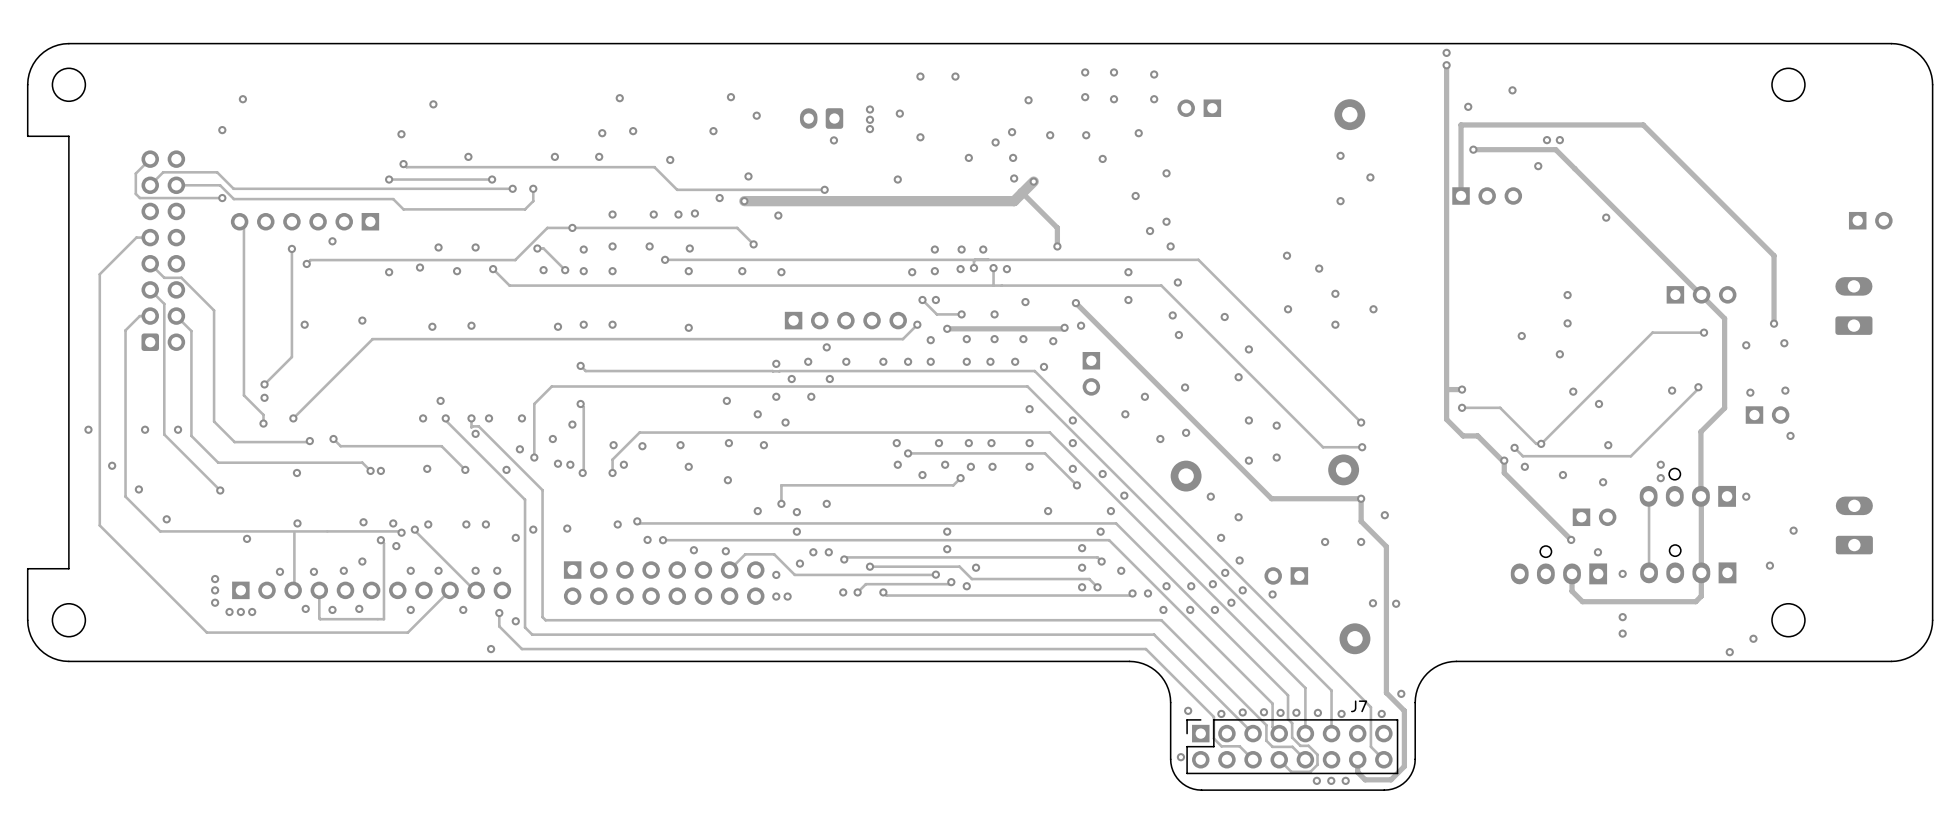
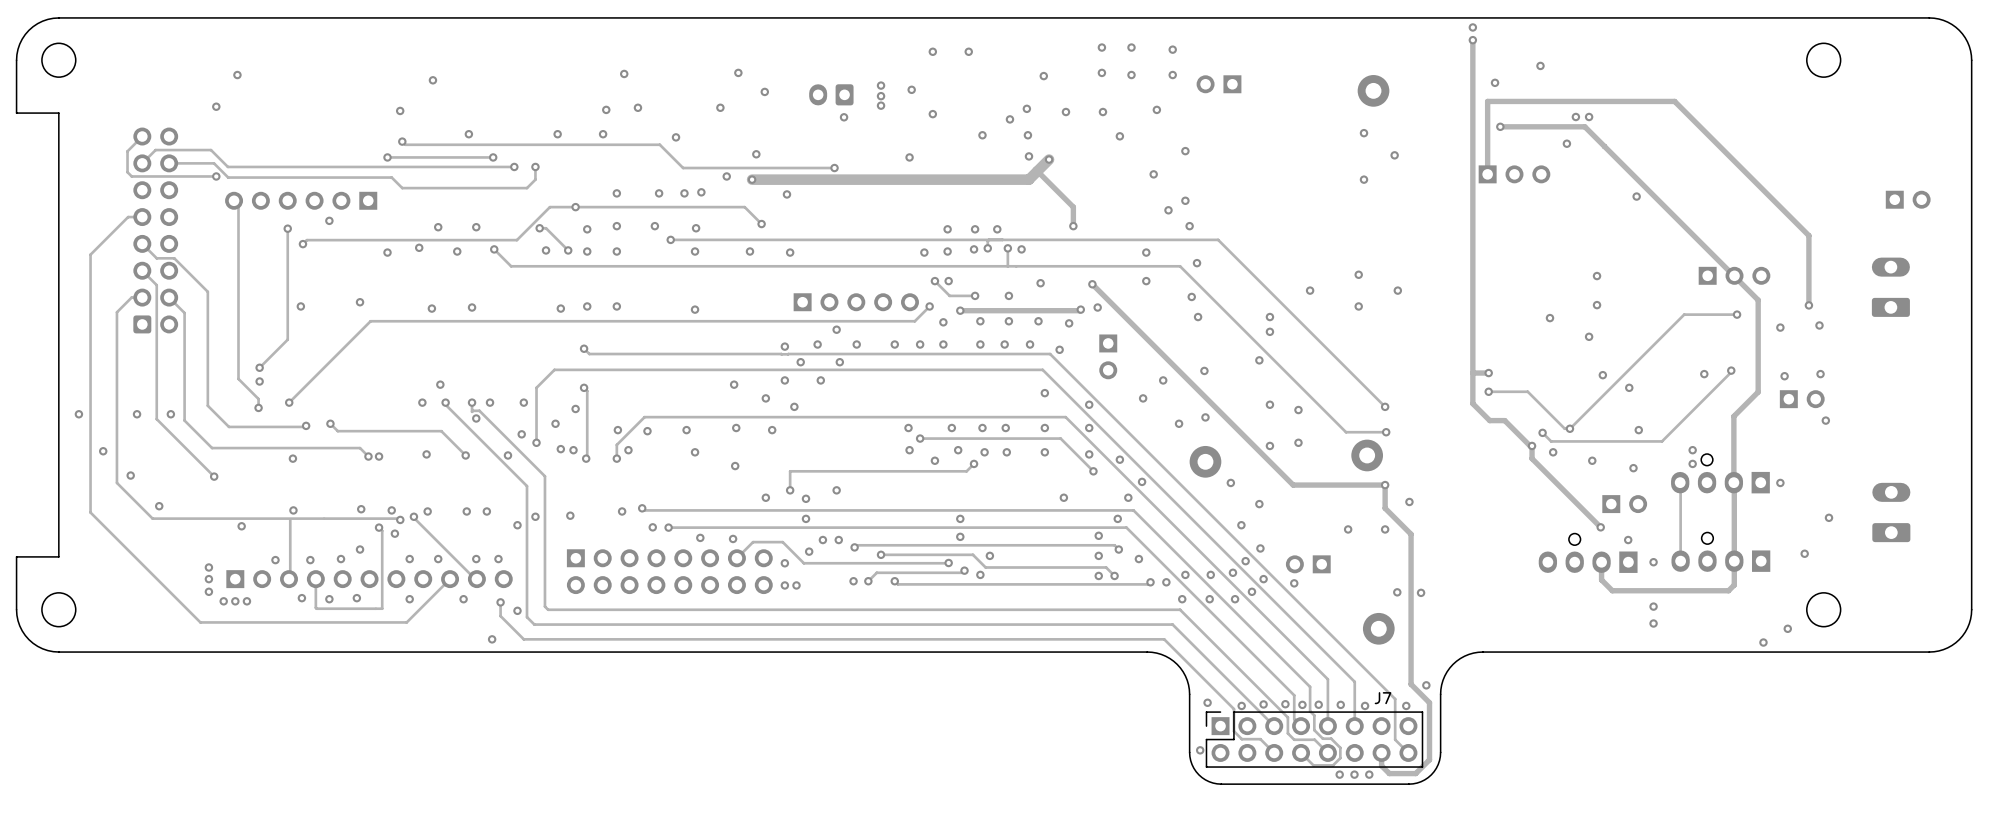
via: (1287, 255) -> none
via: (1319, 268) -> none
via position: (1224, 316) -> (1269, 317)

